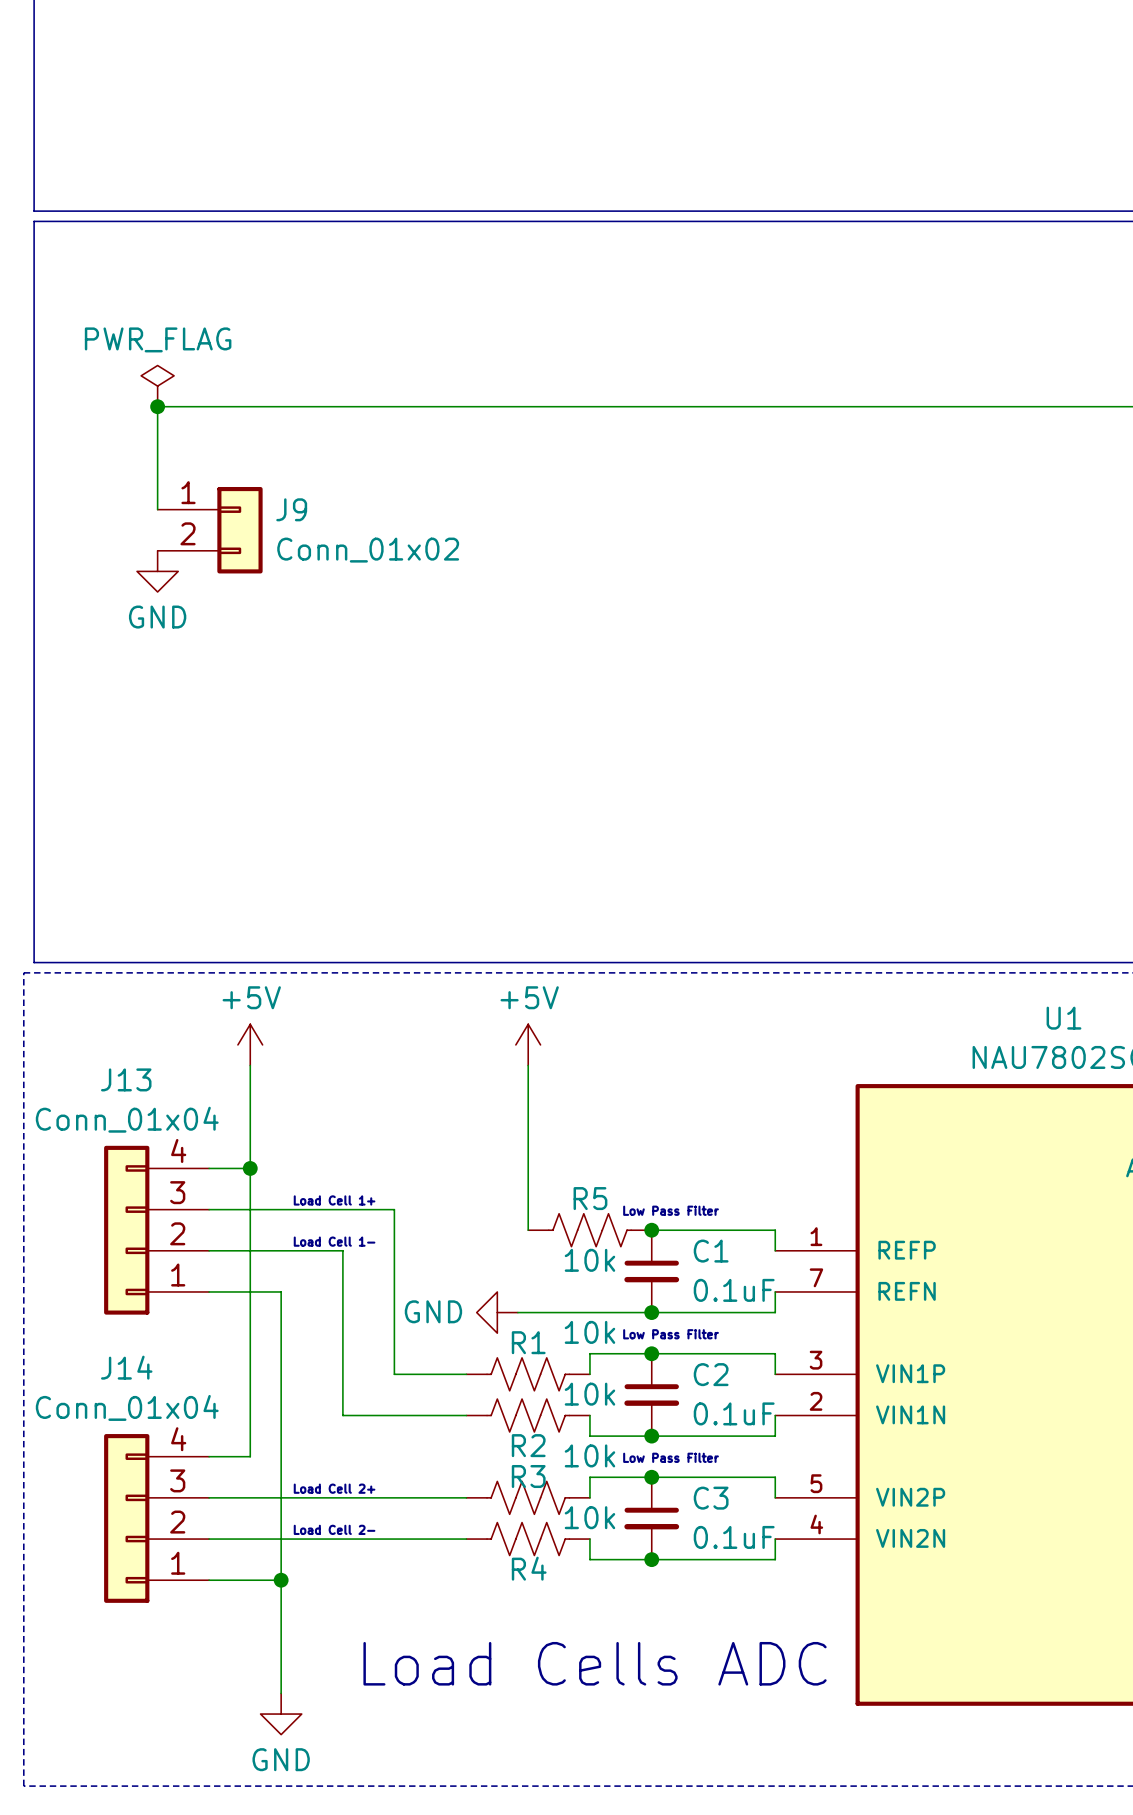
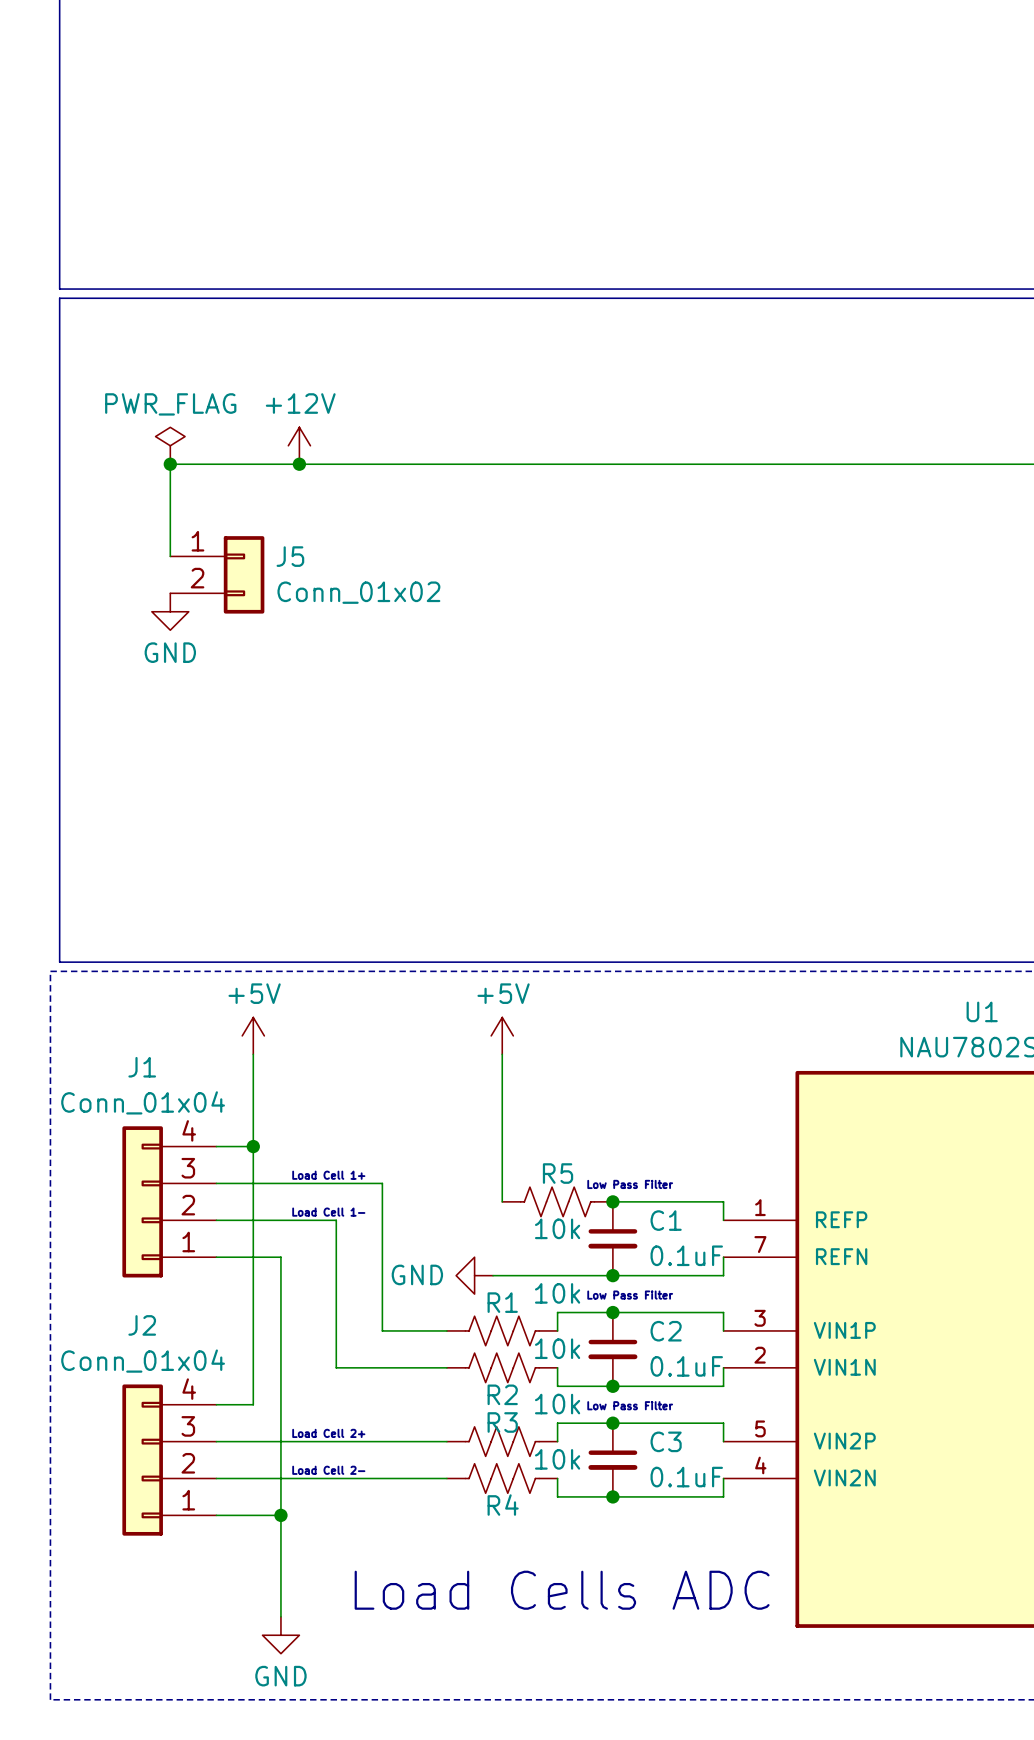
power symbol: none -> +12V (299, 445)
junction: none -> (299, 464)
J9 name: J9 (291, 509) -> J5 (290, 556)
J13 name: J13 (126, 1079) -> J1 (142, 1067)
J14 name: J14 (126, 1367) -> J2 (142, 1325)

